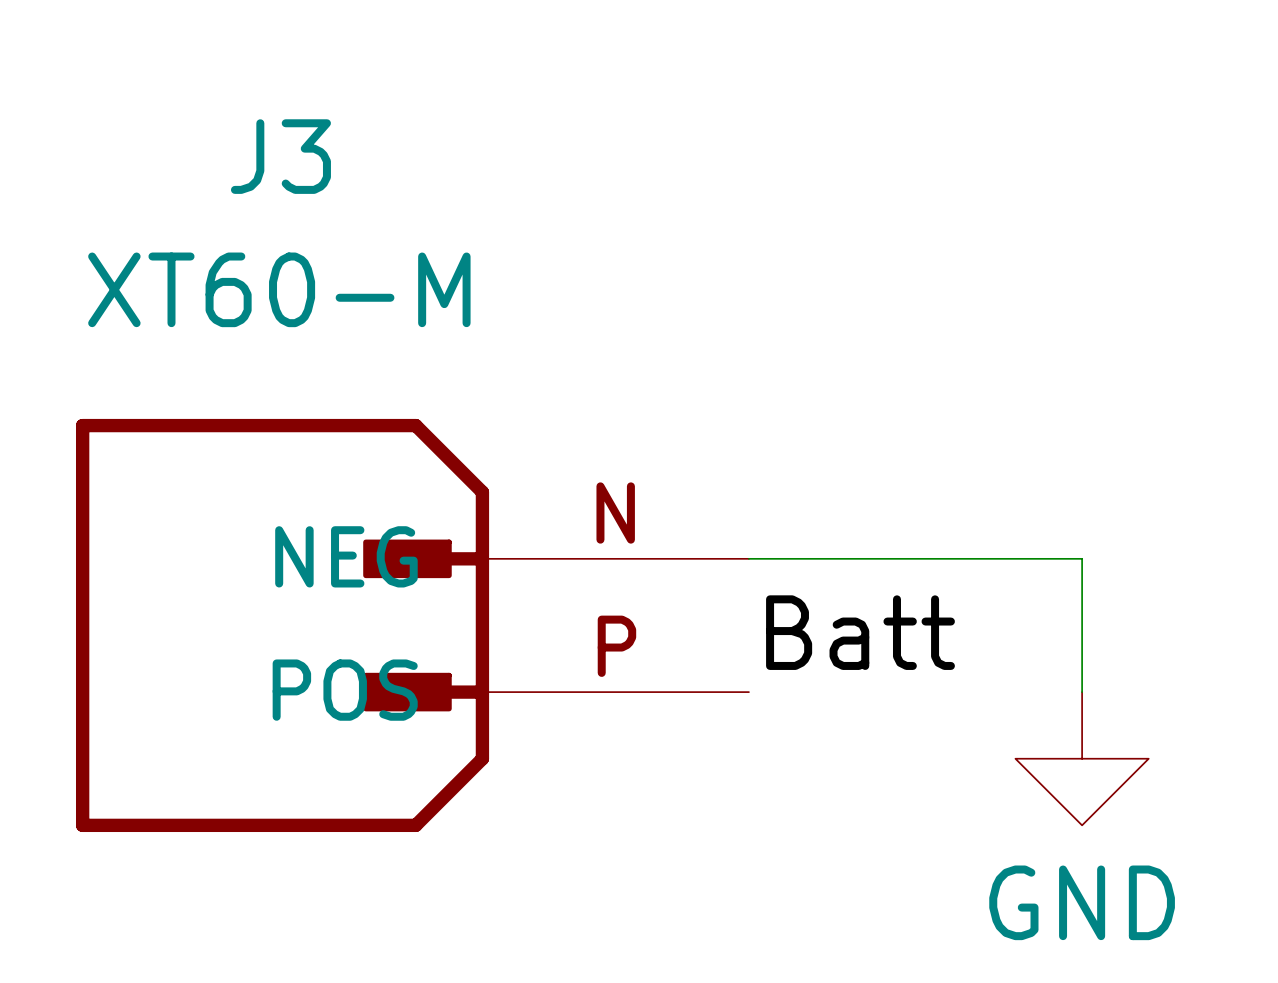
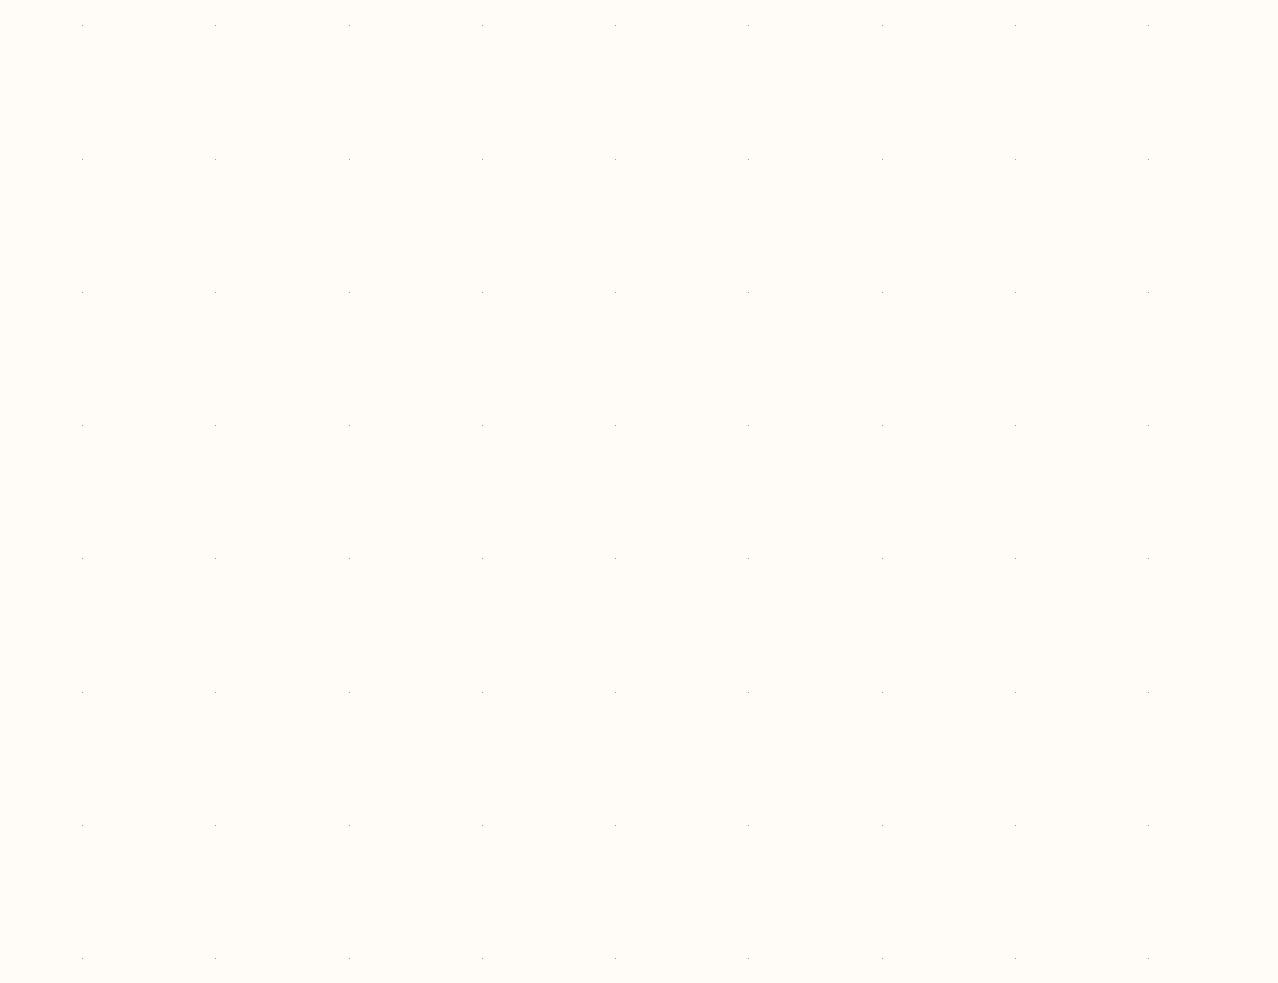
wire: (748, 558) (1082, 558) (1082, 692) -> none
J3: XT60-M (412, 625) -> none
label: Batt (860, 632) -> none
power symbol: GND (1082, 758) -> none

